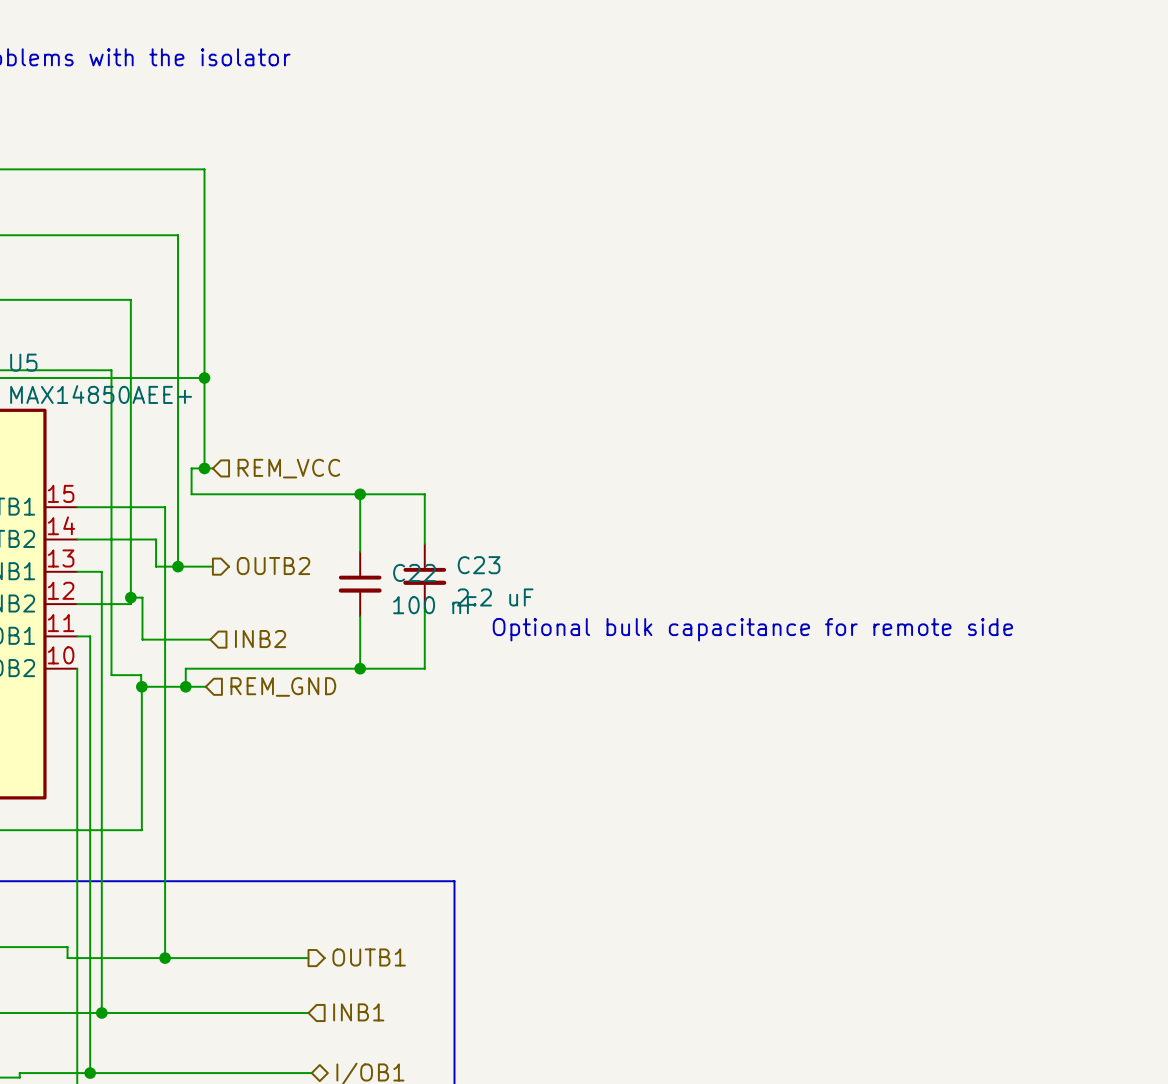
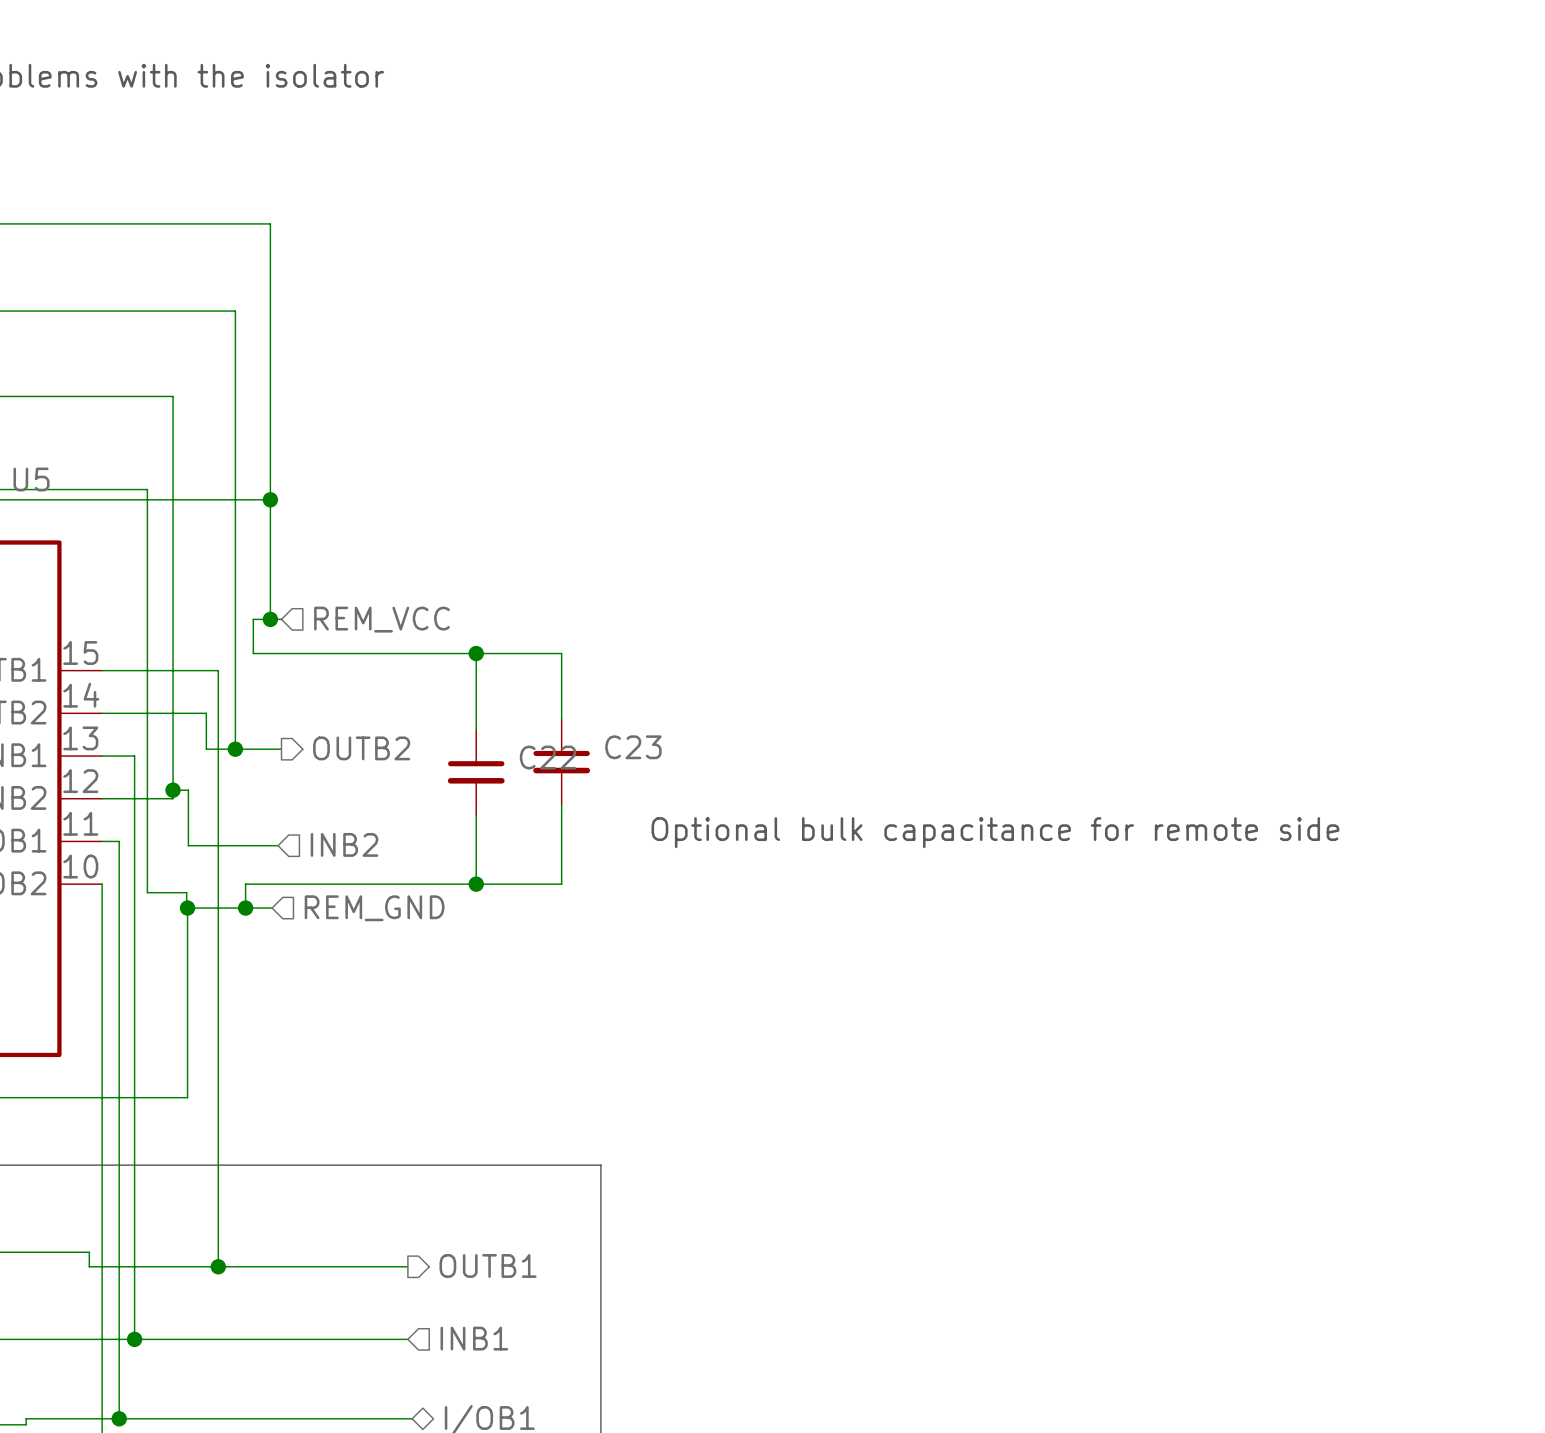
U5 value: MAX14850AEE+ (101, 394) -> none
C23 value: 2.2 uF (495, 597) -> none
C22 value: 100 nF (434, 605) -> none

